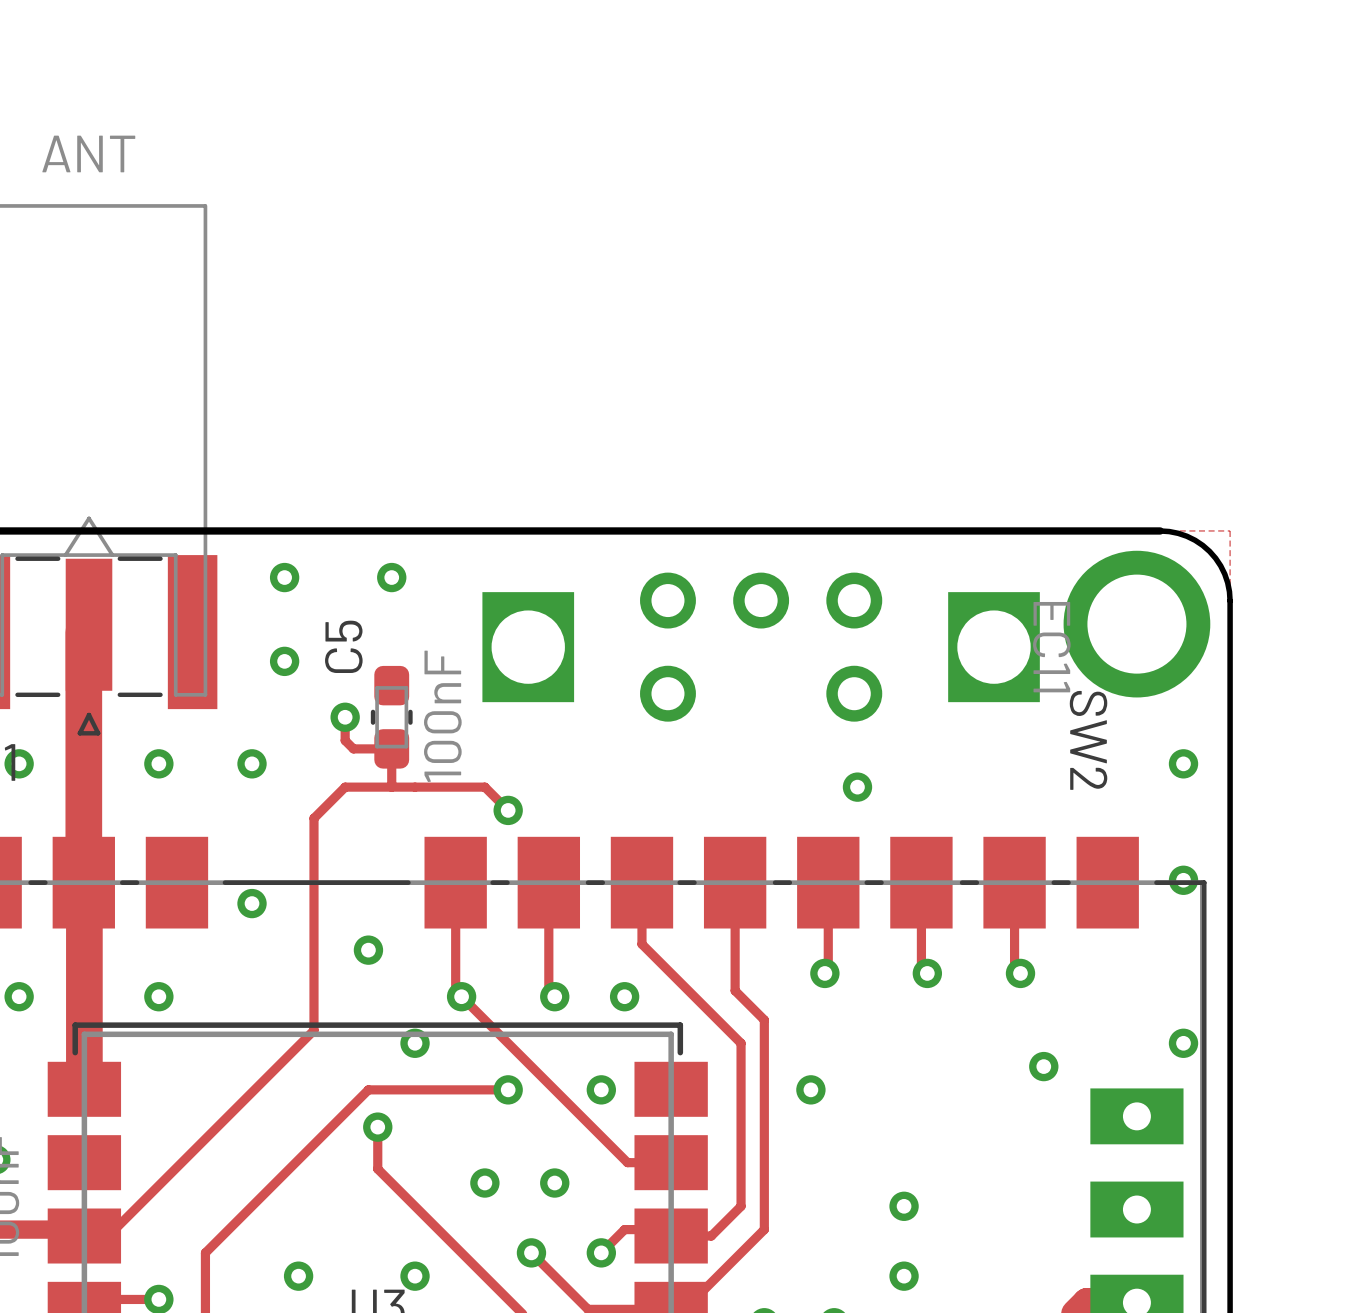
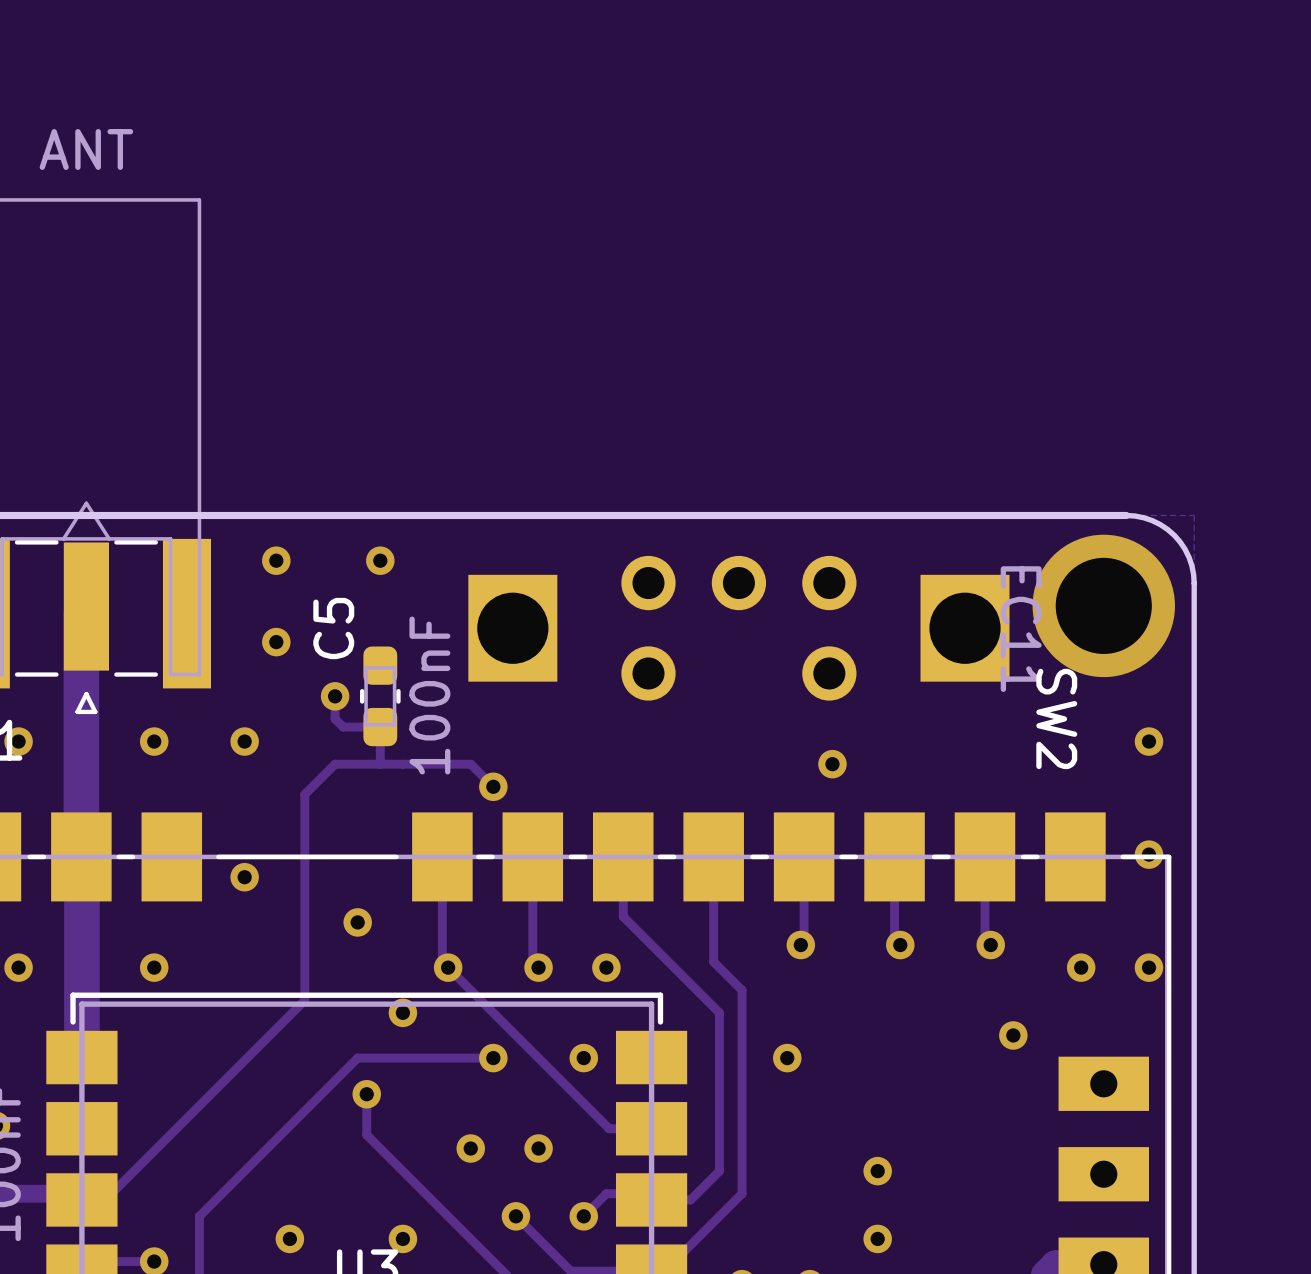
via: none -> (1081, 967)
via: none -> (1148, 967)
via: (1183, 1043) -> none

